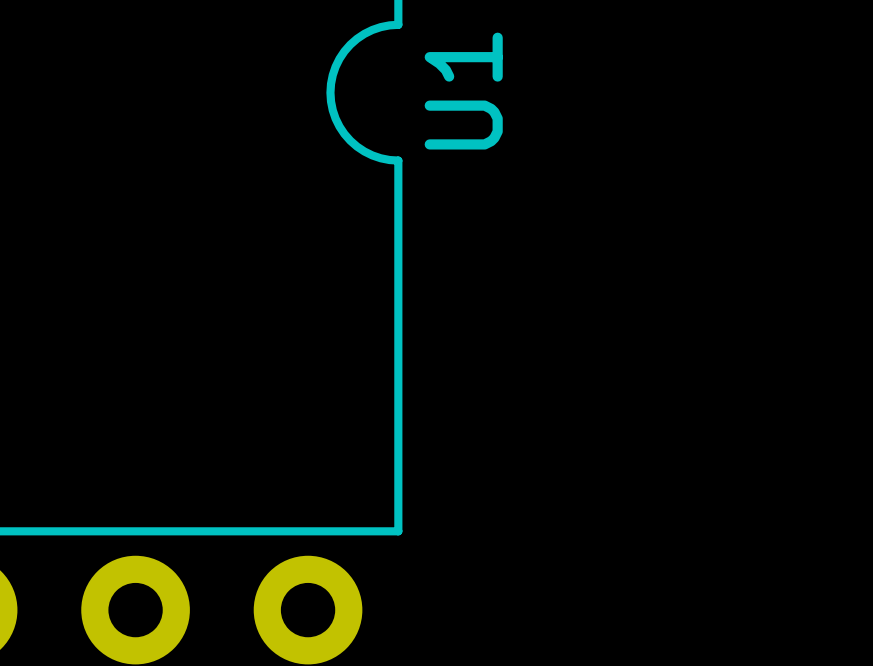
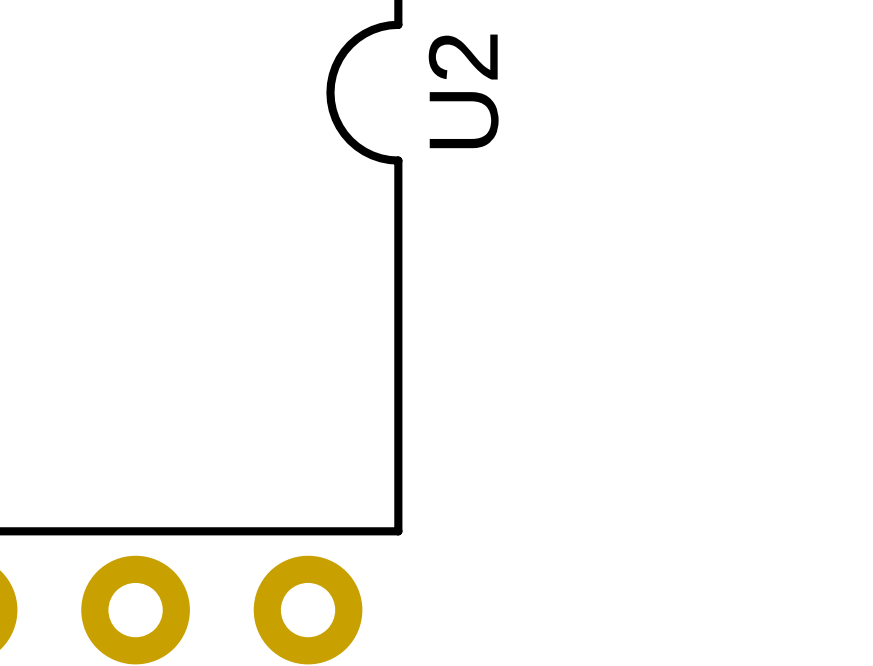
U1 name: U1 (463, 91) -> U2 (463, 91)

